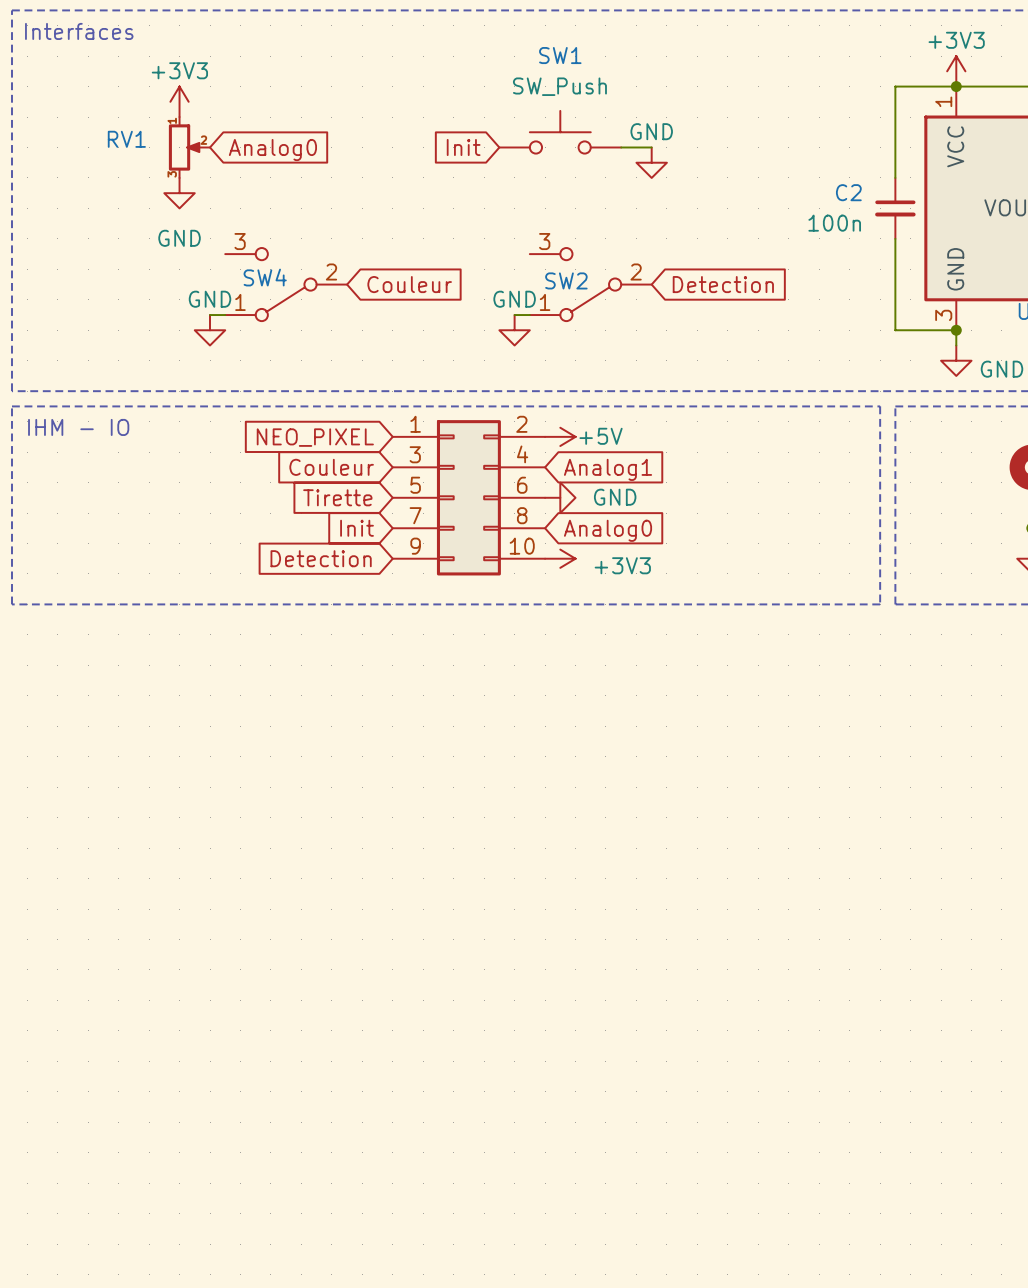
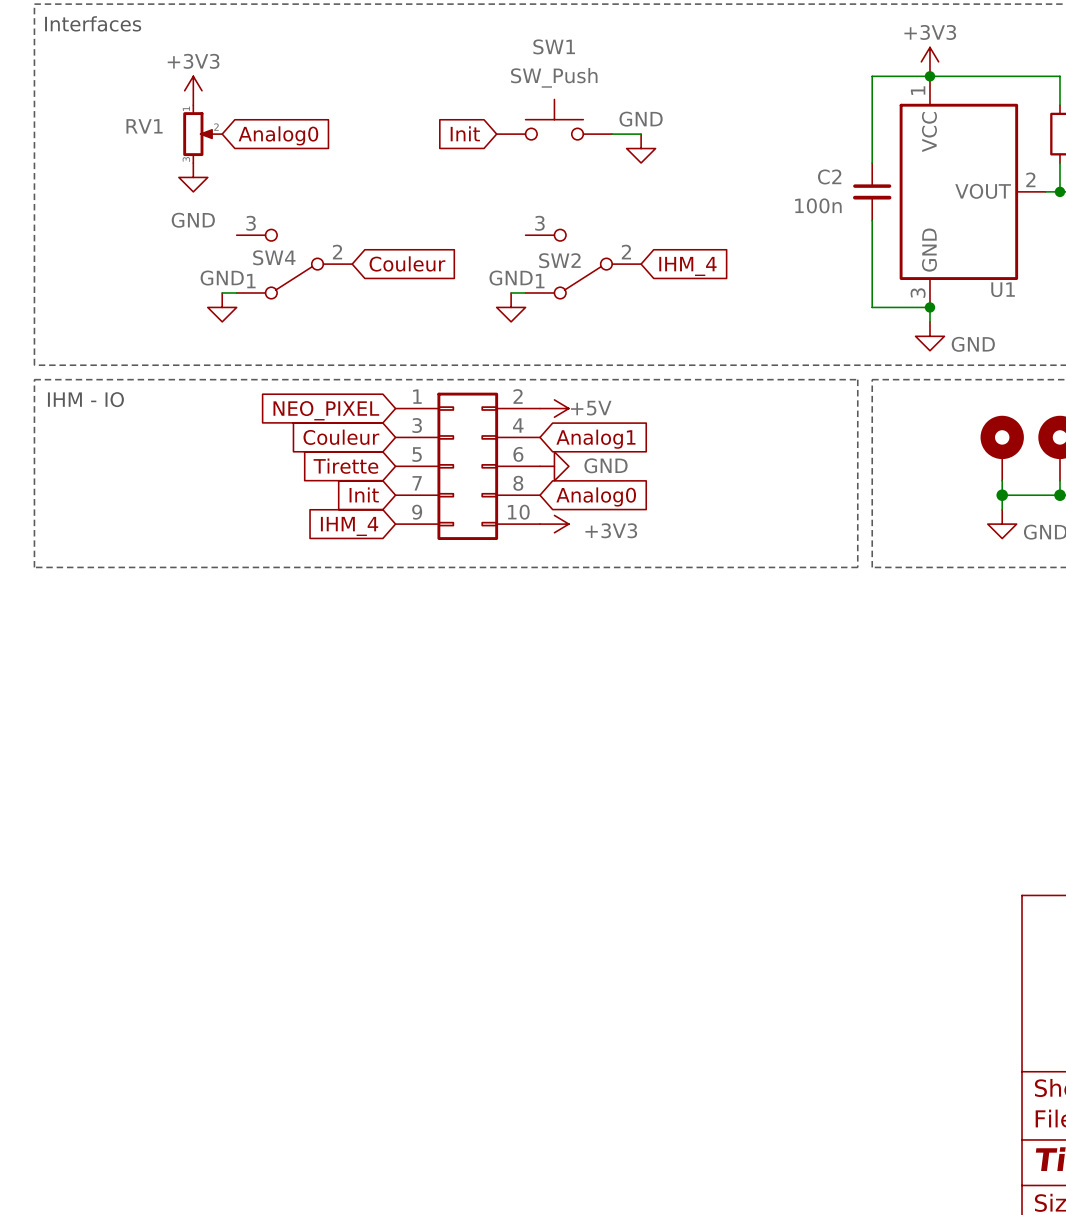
global label: Detection (723, 284) -> IHM_4 (687, 266)
global label: Detection (321, 558) -> IHM_4 (349, 526)

